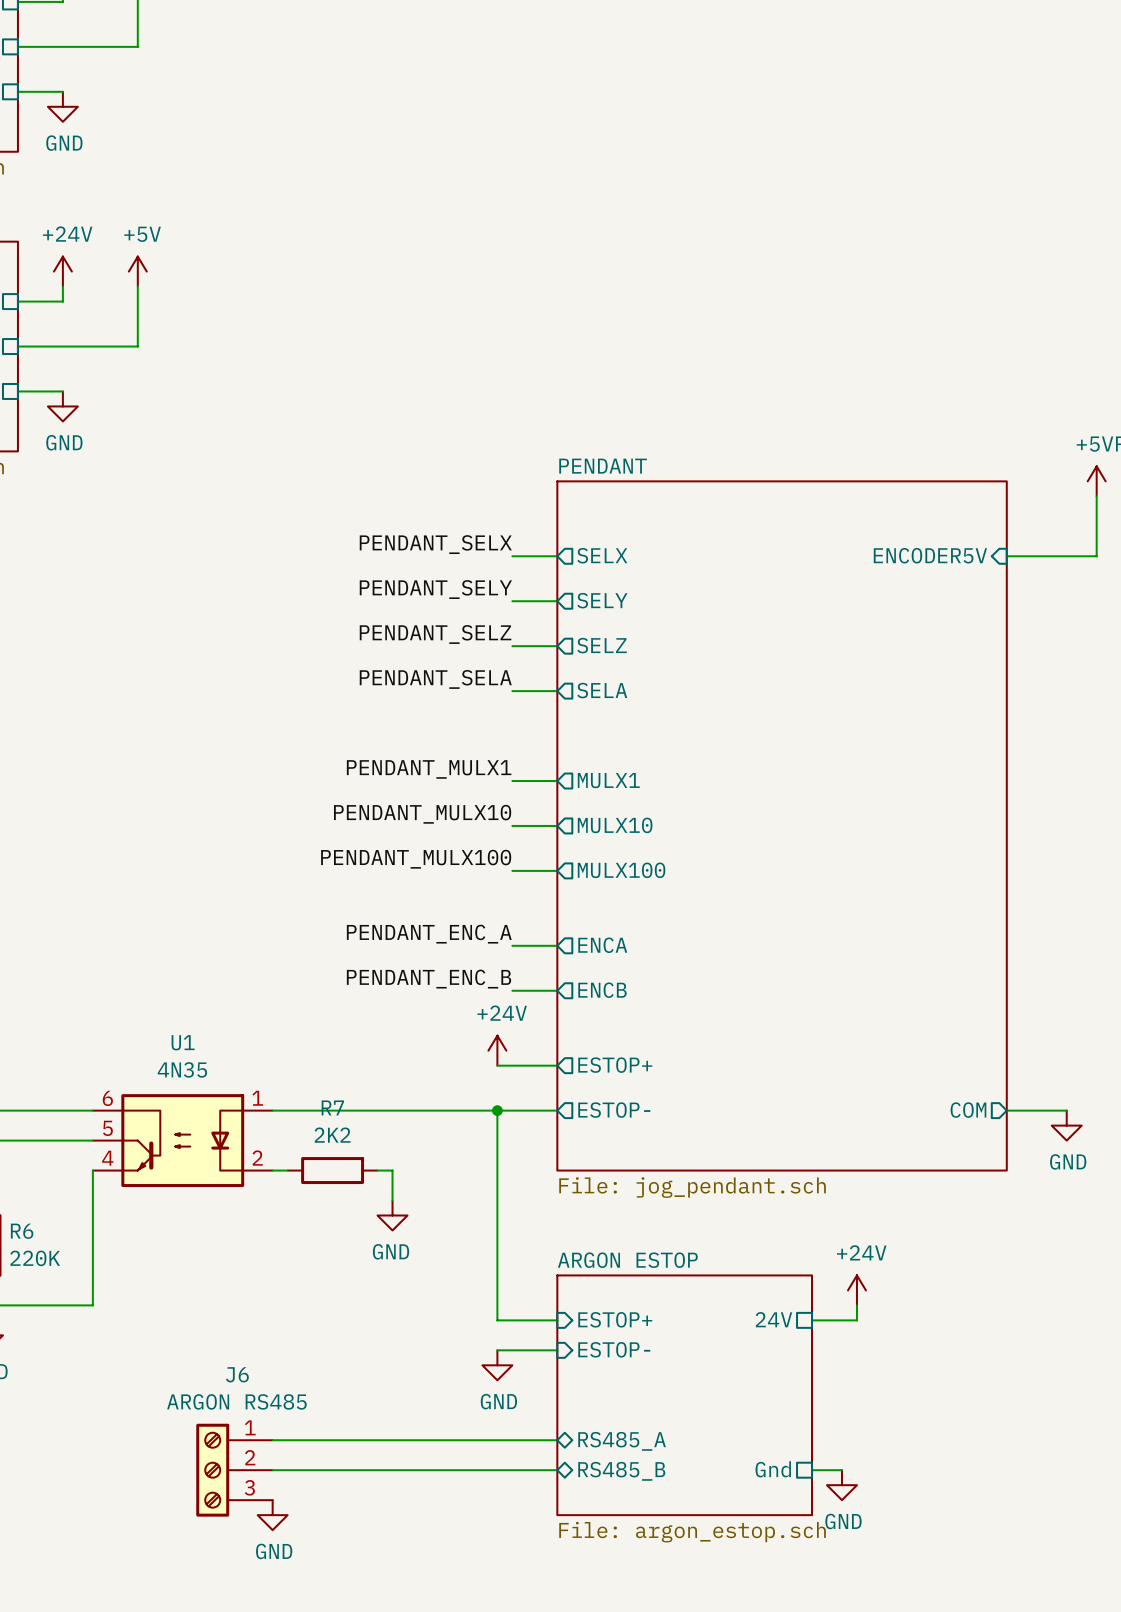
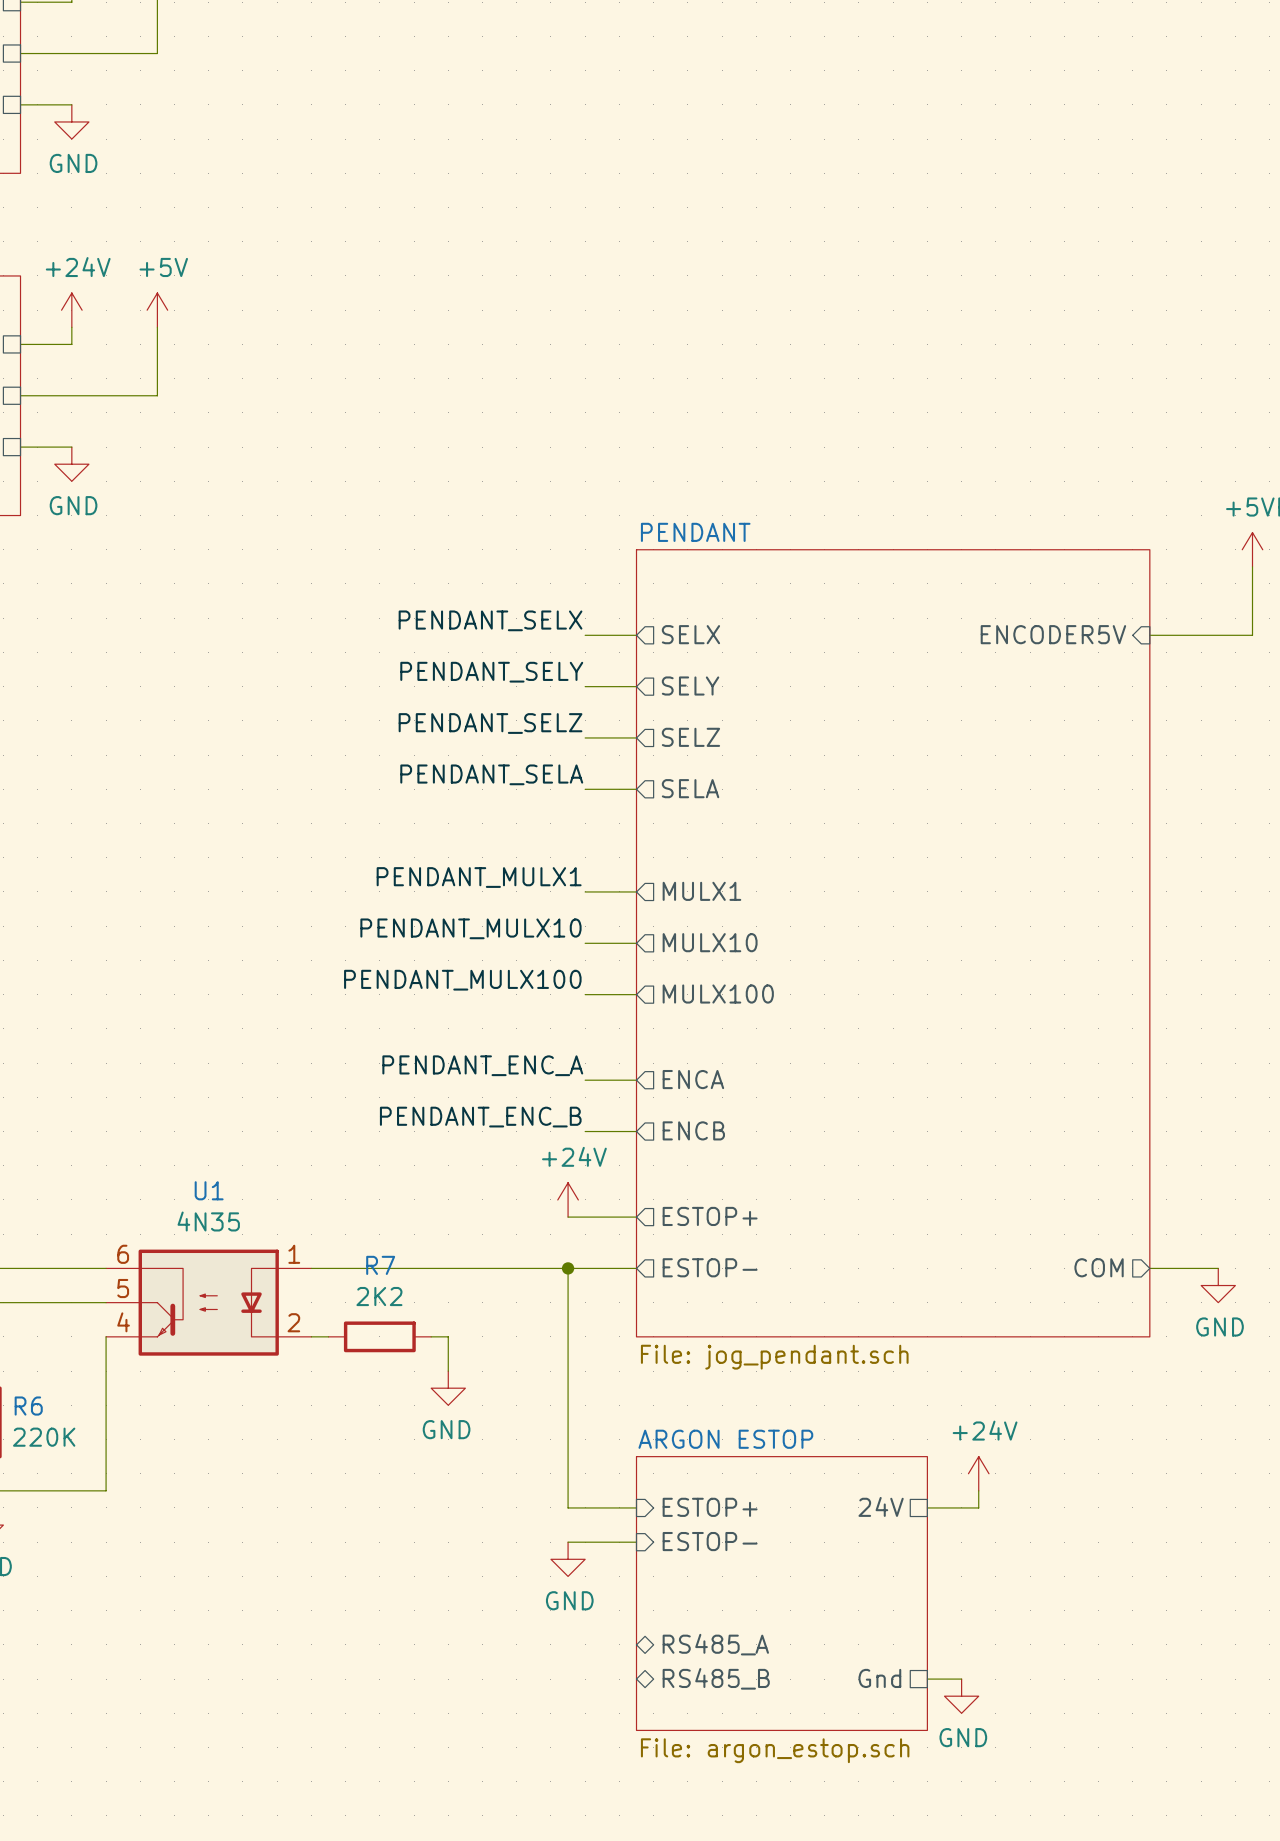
wire: (272, 1440) (557, 1440) -> none
J6: ARGON RS485 (234, 1470) -> none
wire: (272, 1470) (557, 1470) -> none
power symbol: GND (272, 1515) -> none

